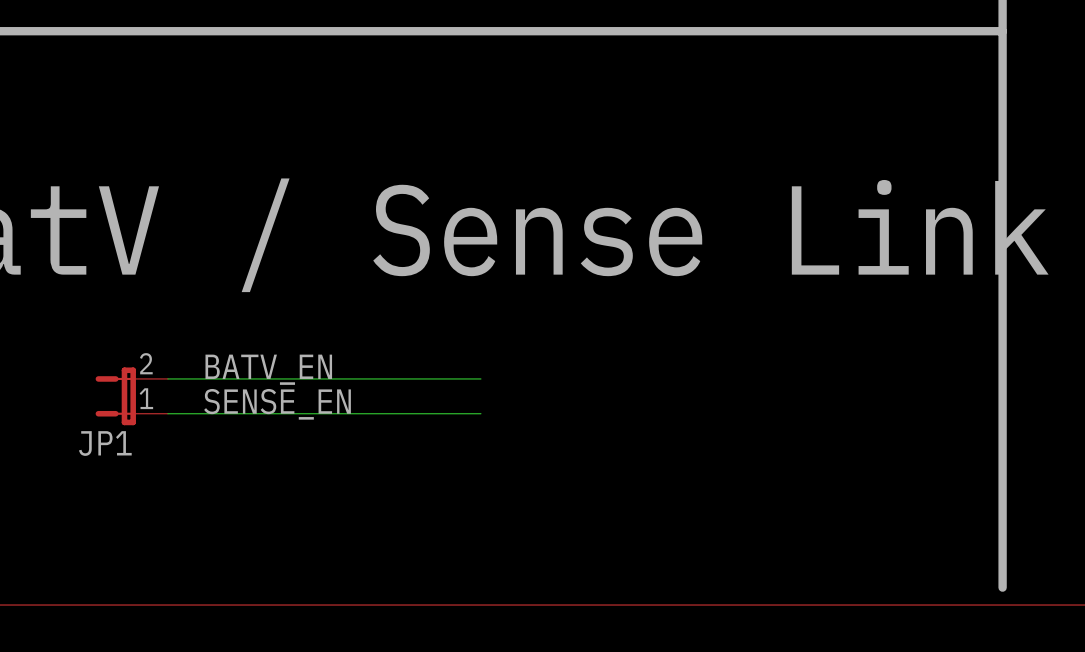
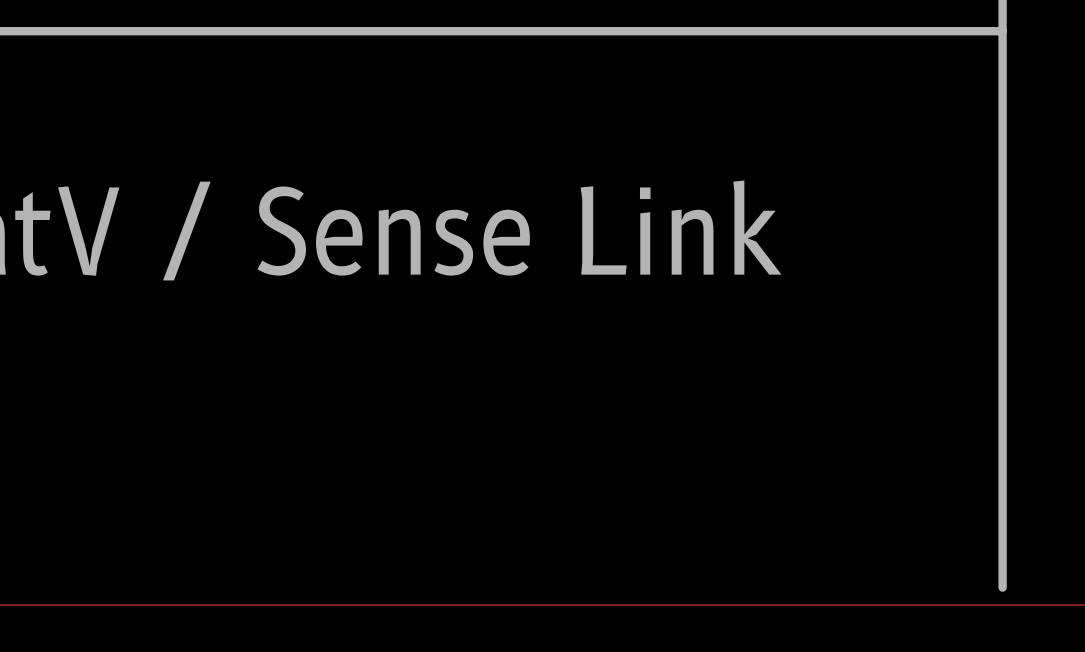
label: BATV_EN (268, 369) -> none
wire: (167, 378) (480, 378) -> none
JP1: (131, 396) -> none
label: SENSE_EN (277, 404) -> none
wire: (167, 413) (480, 413) -> none

